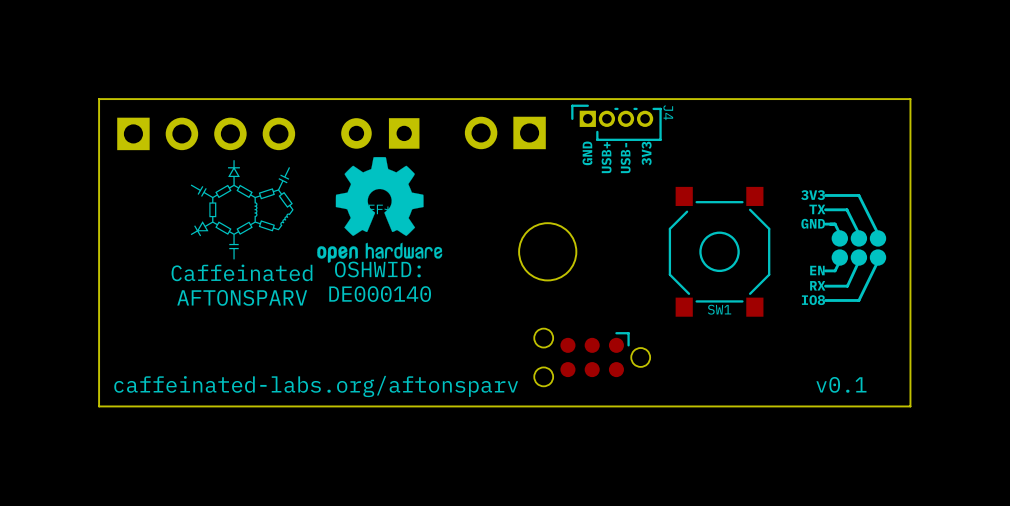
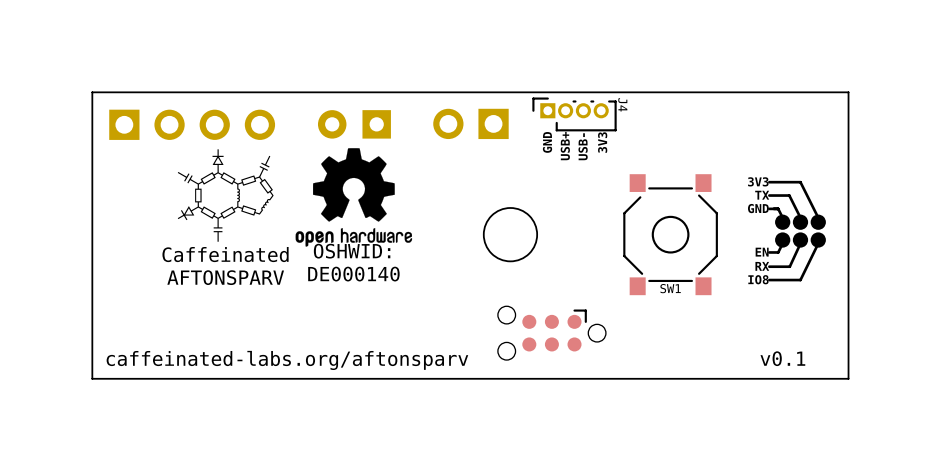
drawing: none -> [295, 148, 413, 247]
part: (379, 209) -> none

